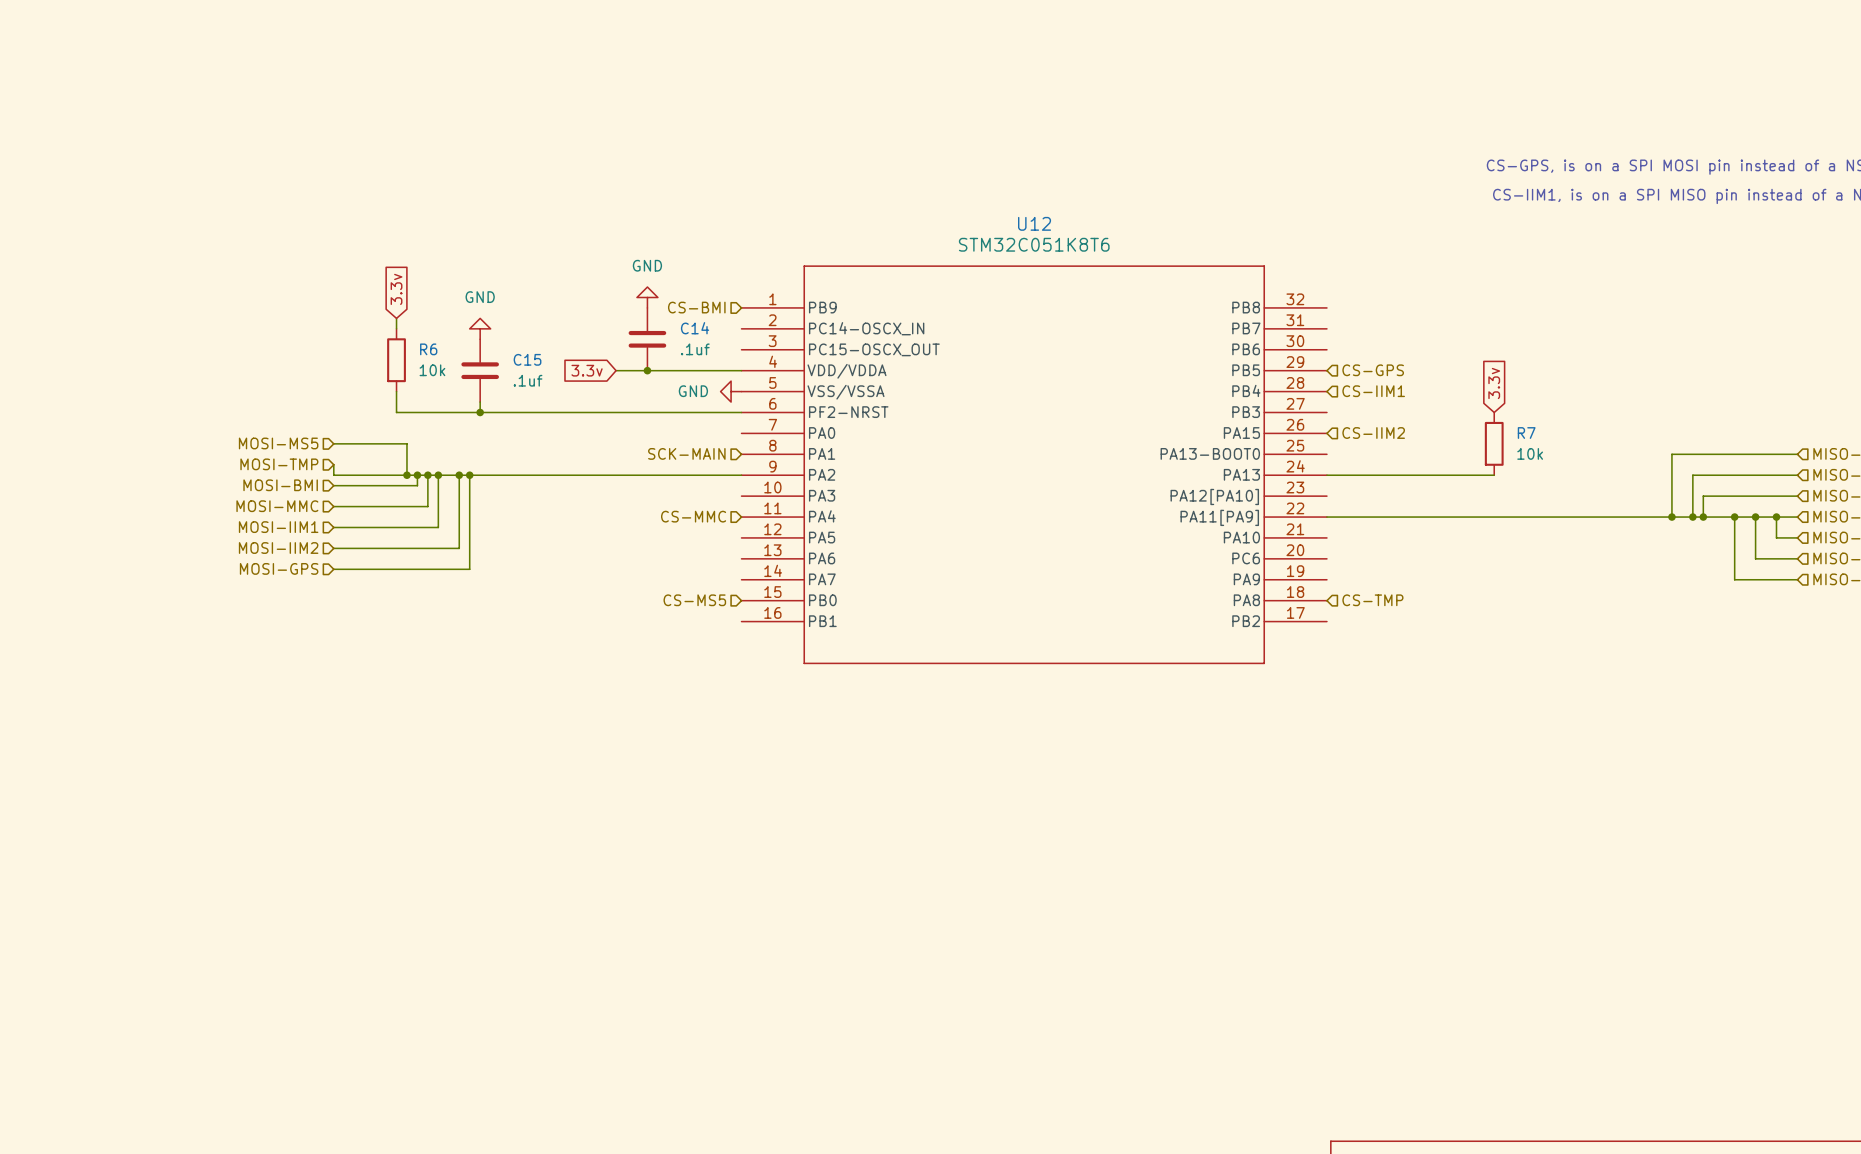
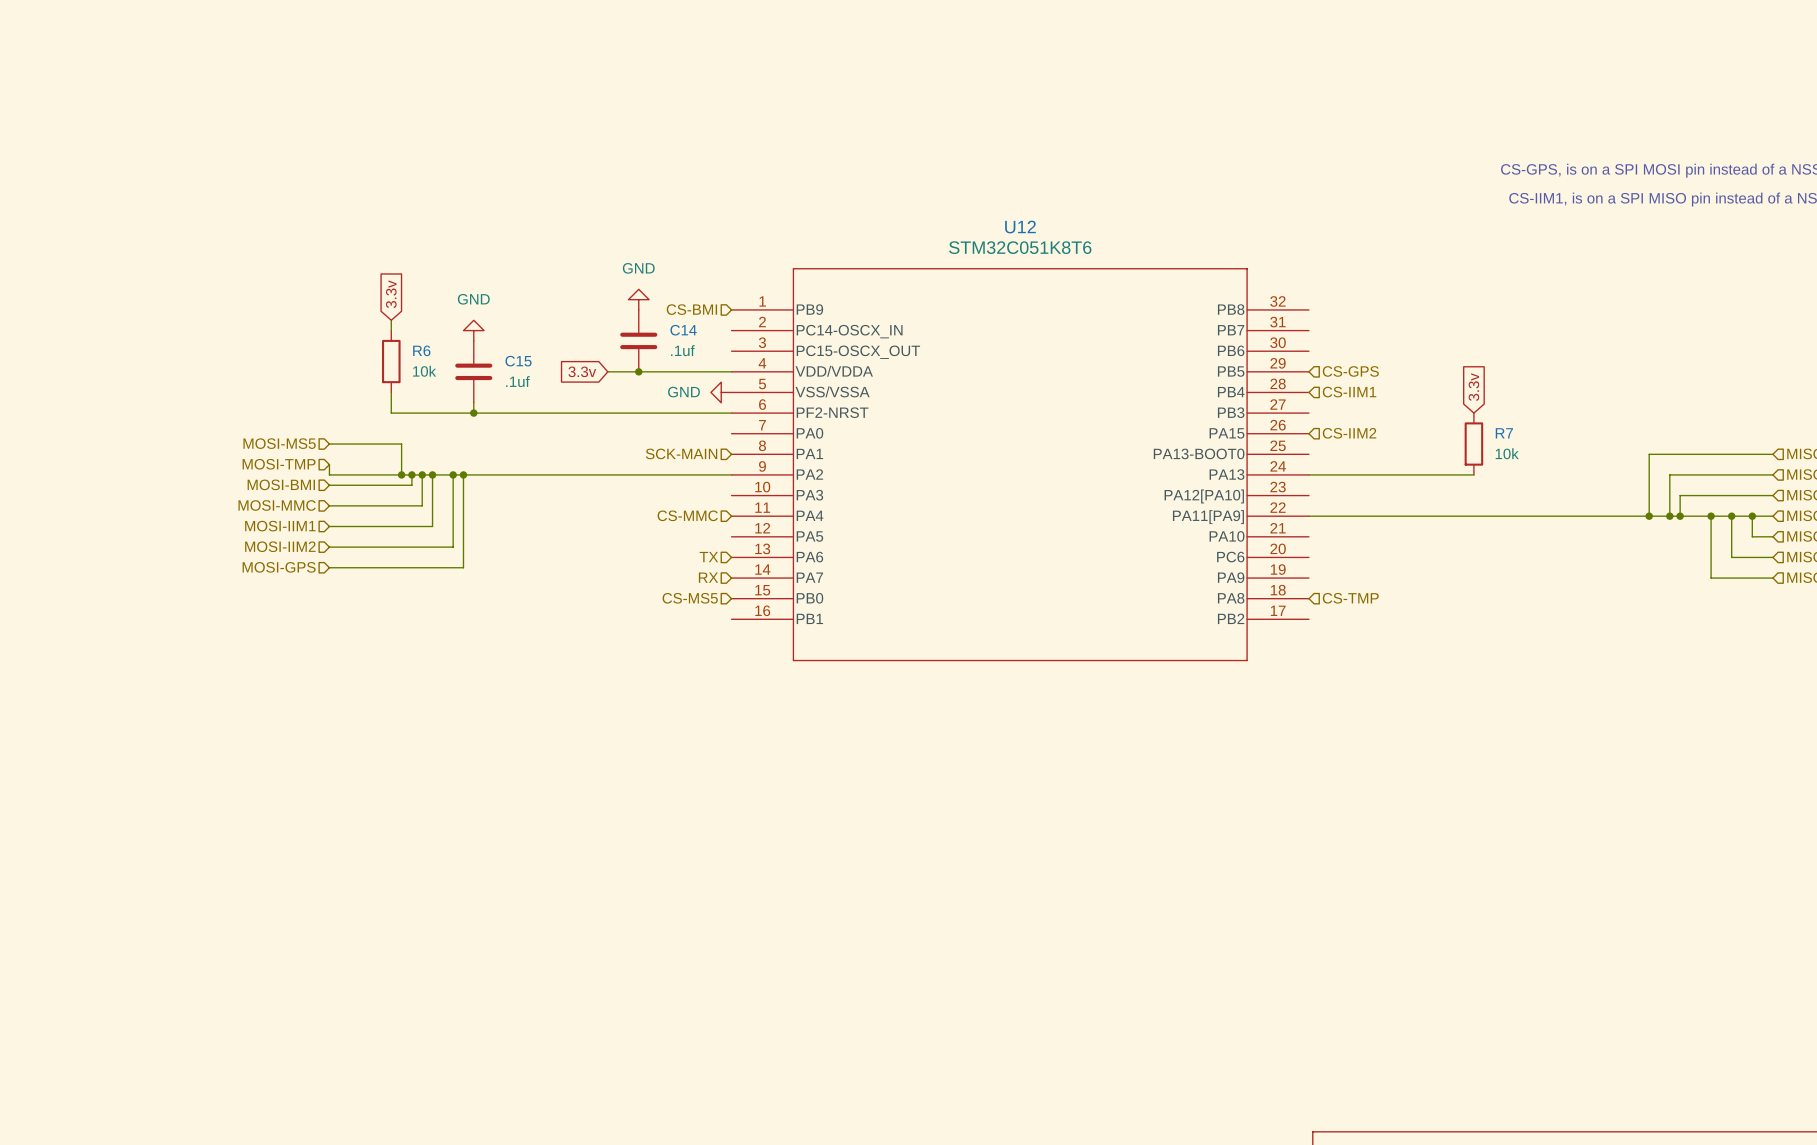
hierarchical label: none -> TX (708, 557)
hierarchical label: none -> RX (708, 577)

